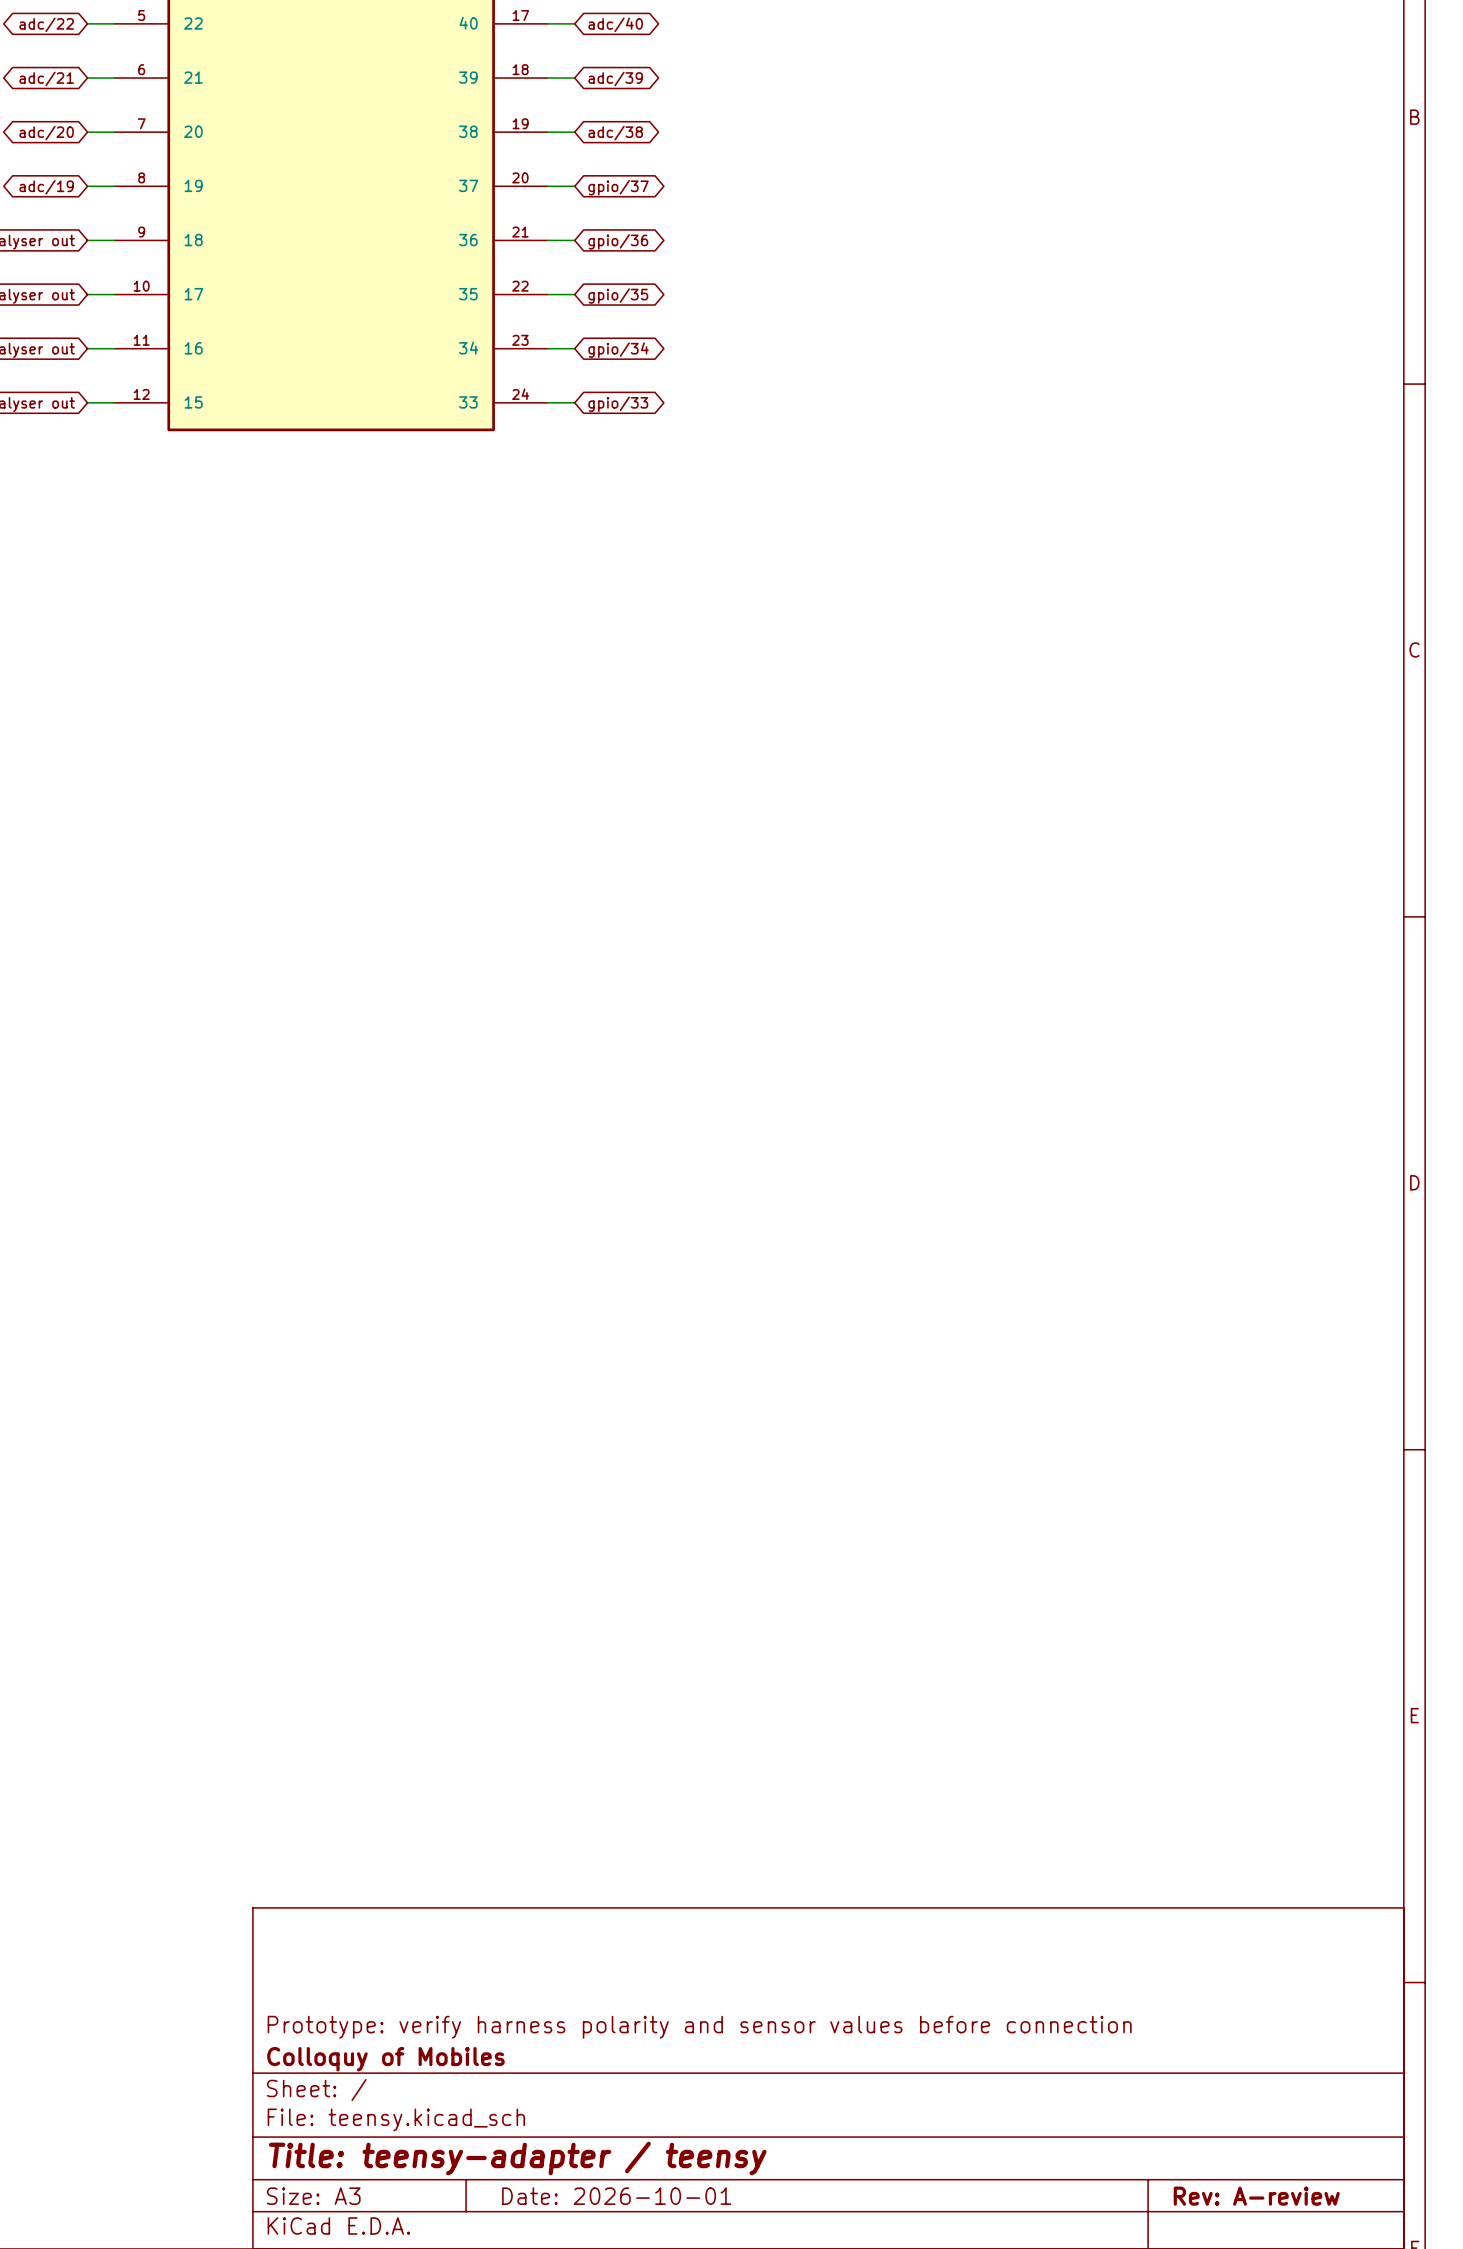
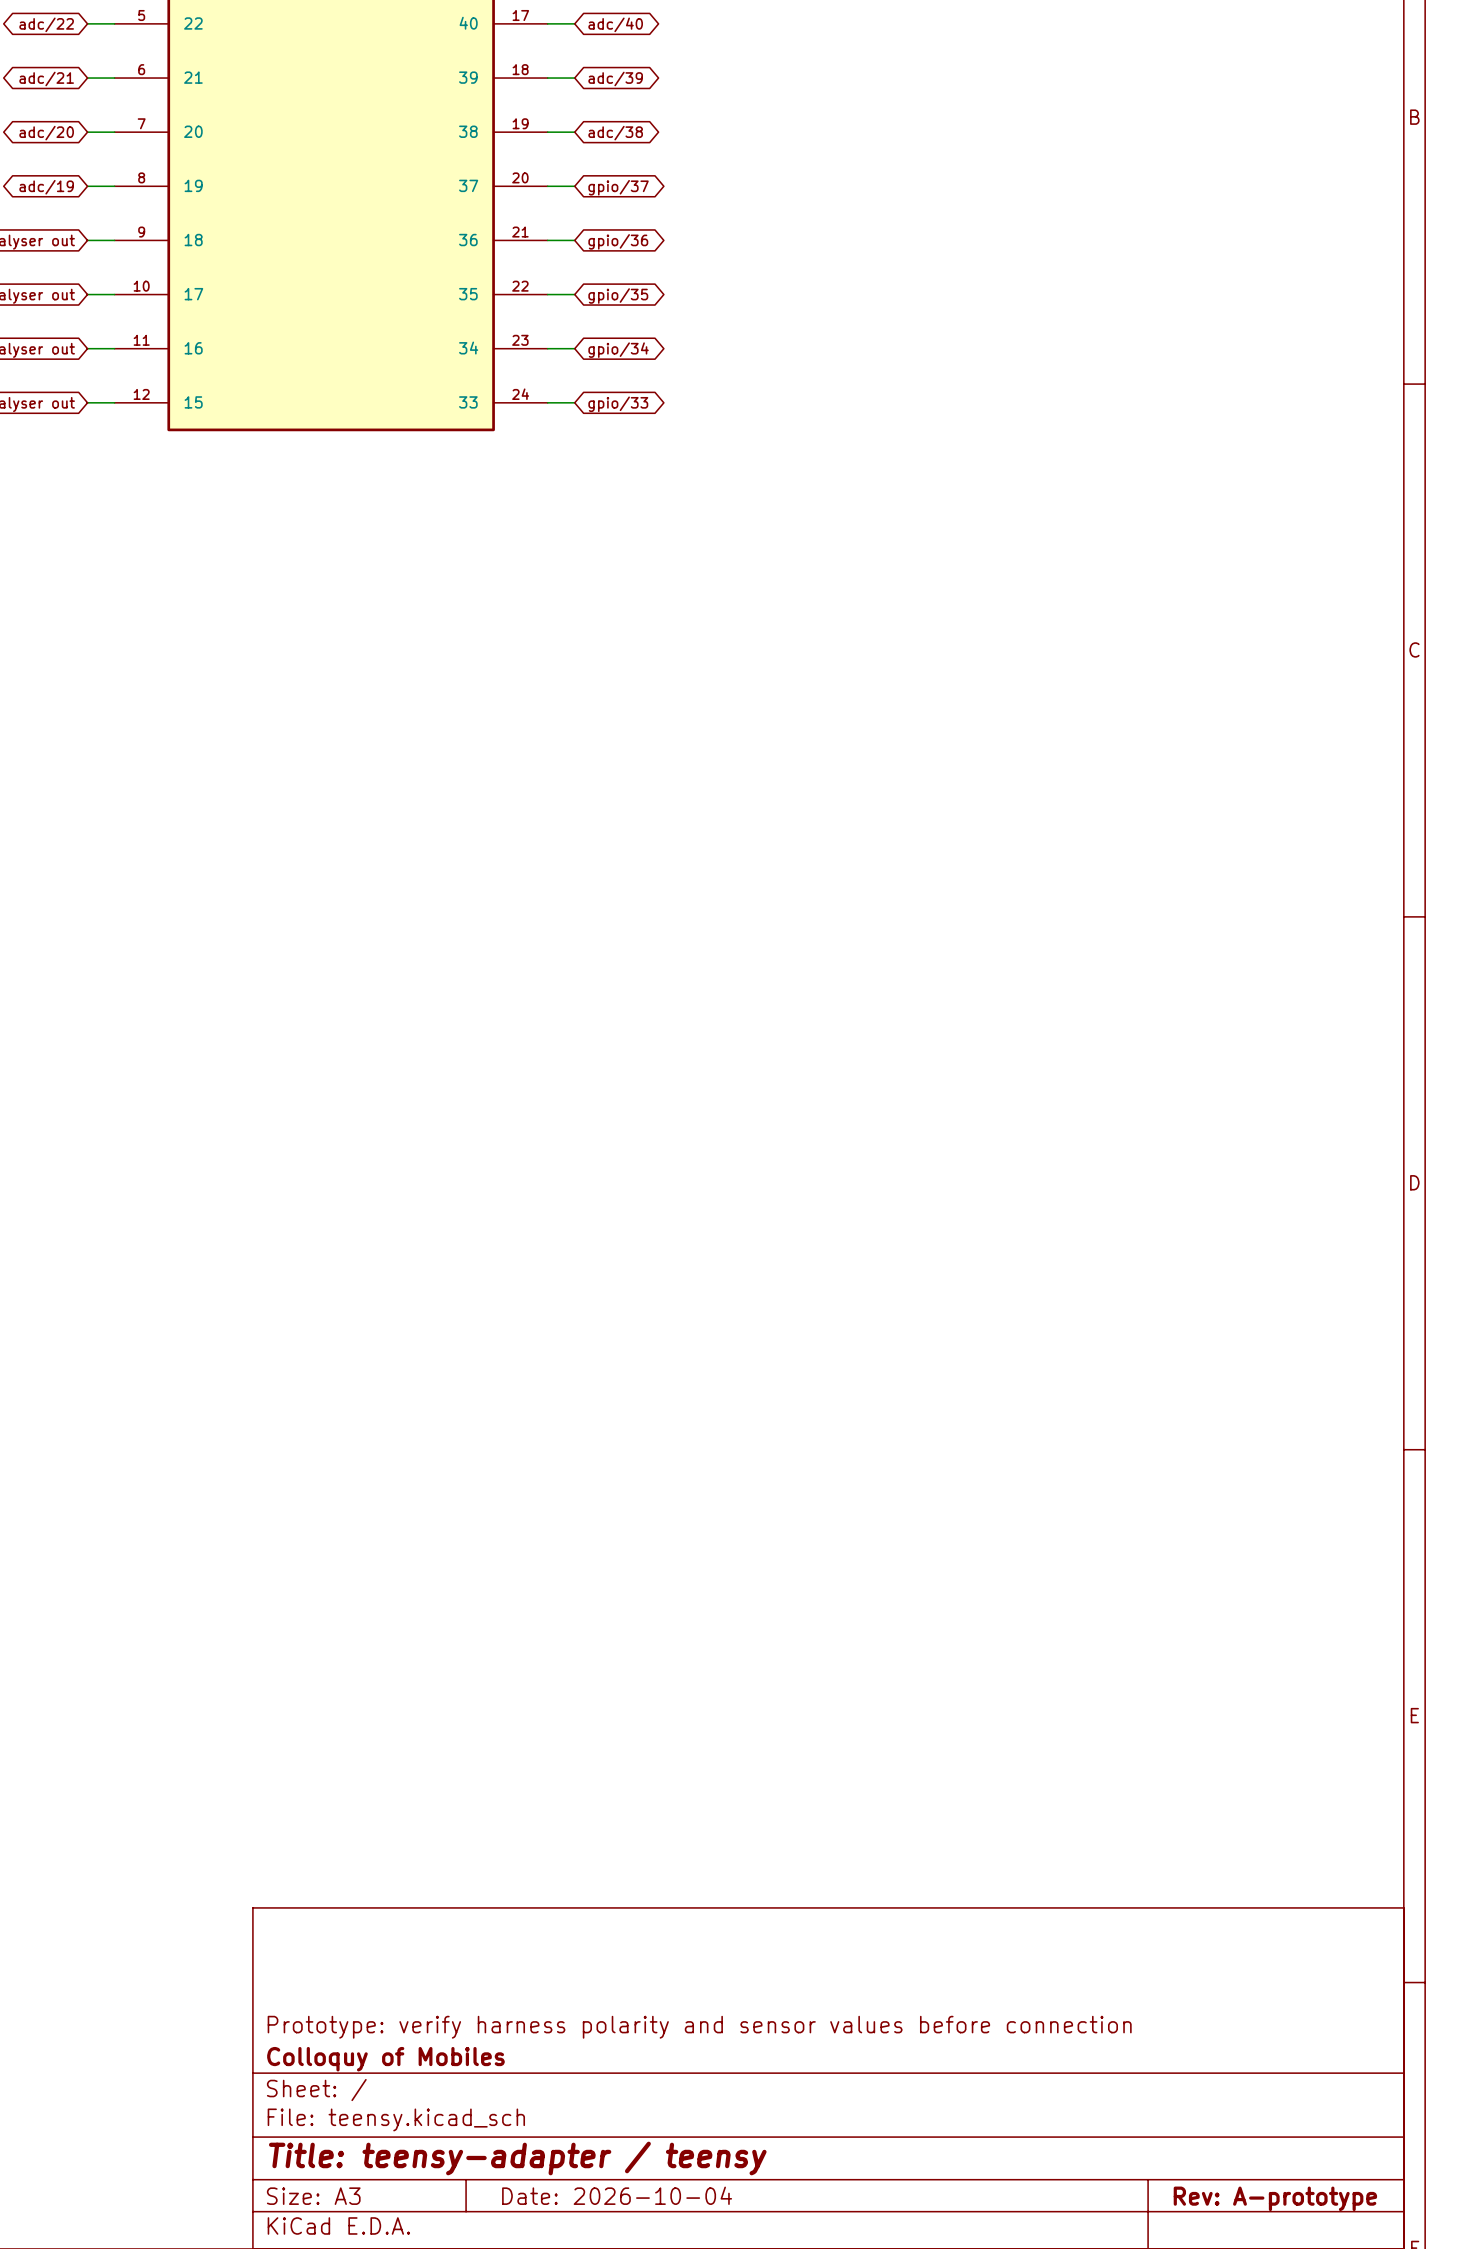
title block: Date: 2026-10-01 (616, 2196) -> Date: 2026-10-04 (617, 2195)
title block: Rev: A-review (1256, 2196) -> Rev: A-prototype (1275, 2198)

